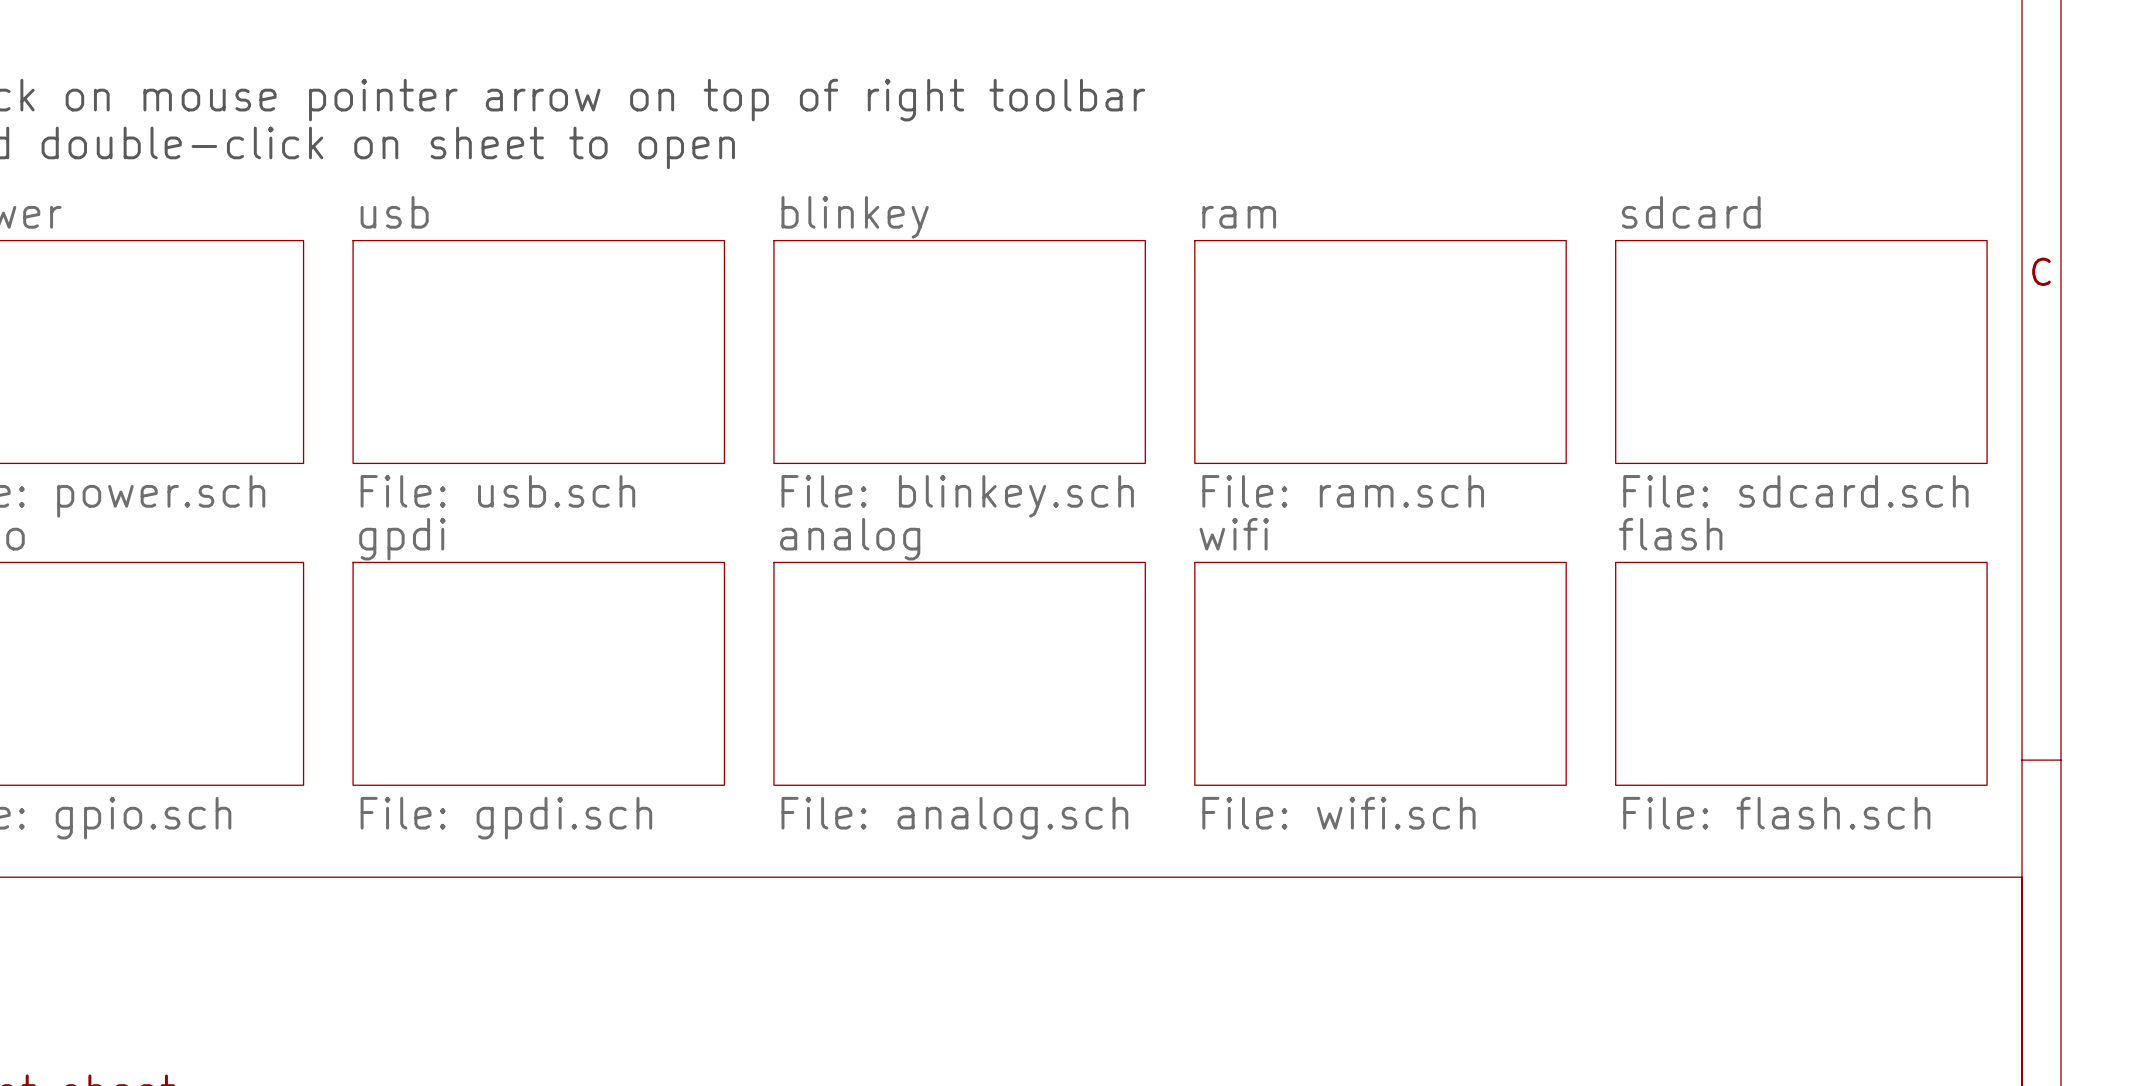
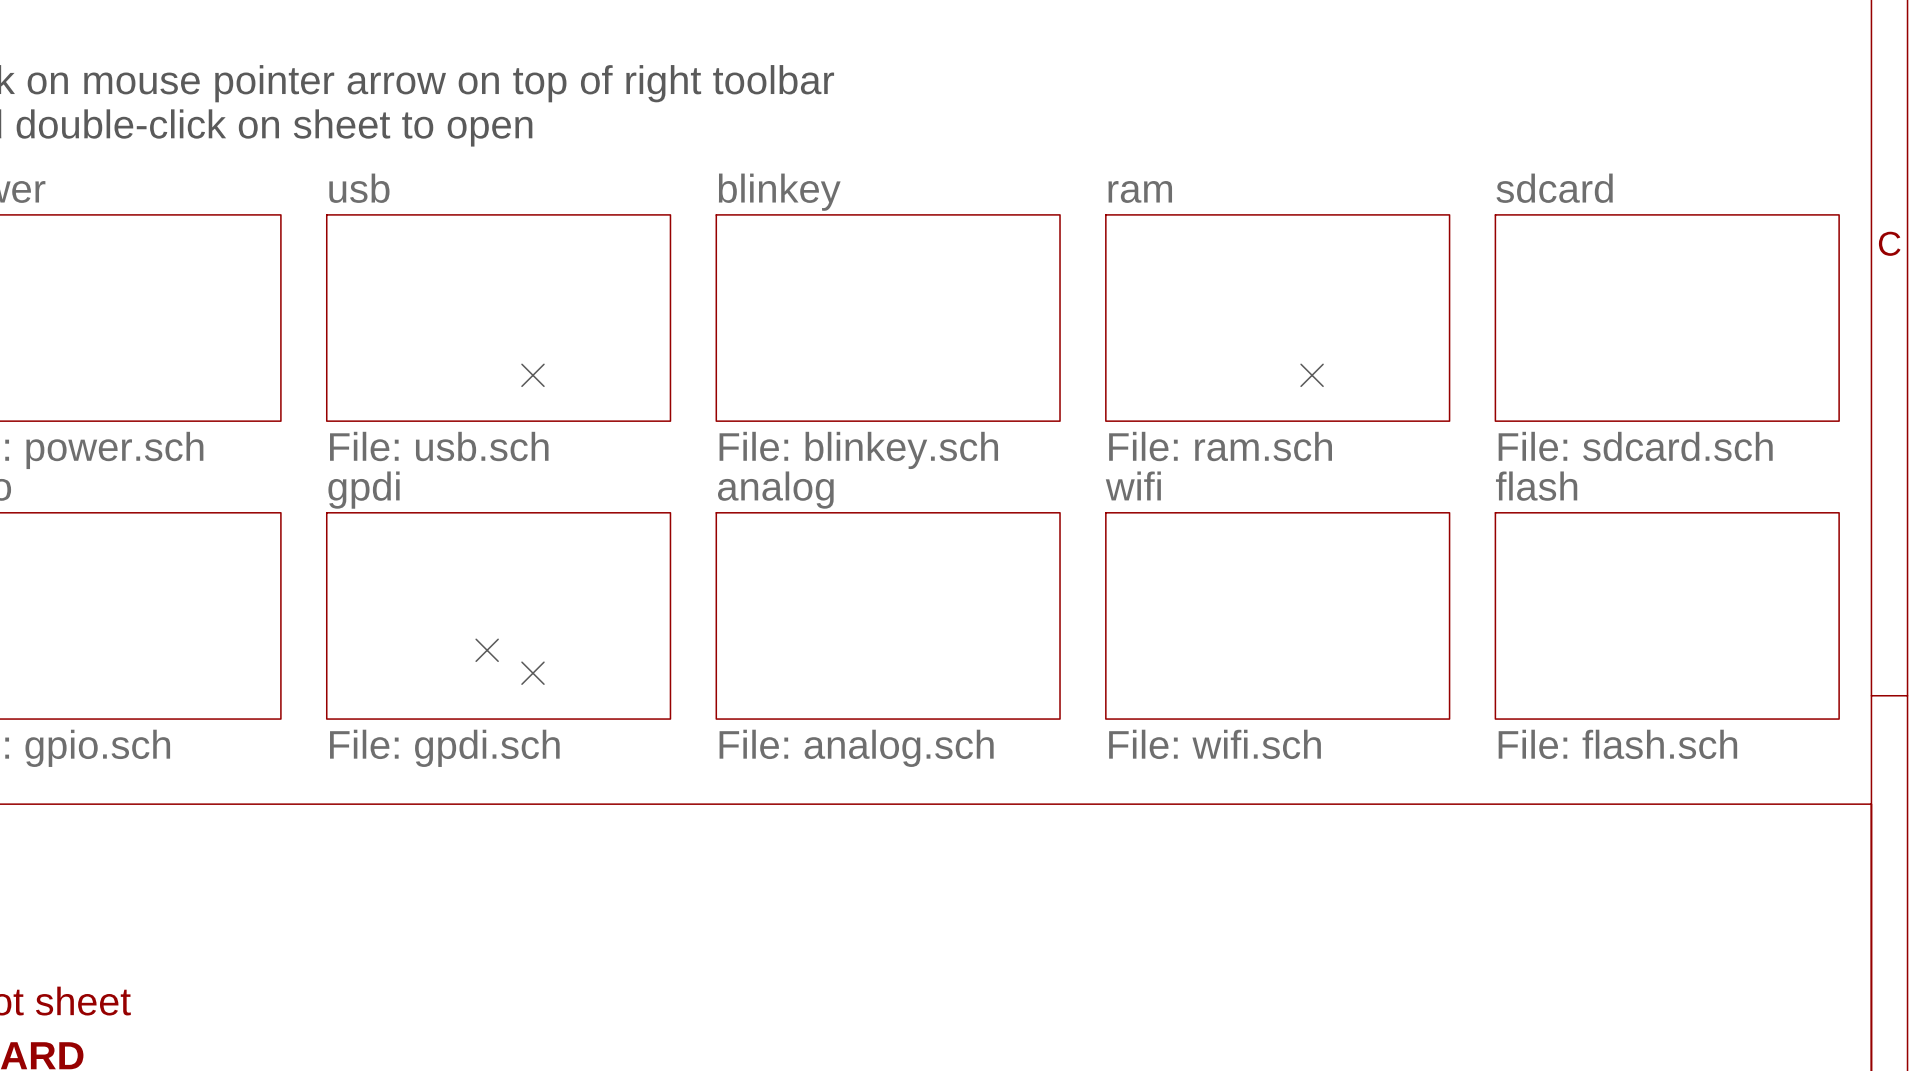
no-connect mark: none -> (532, 375)
no-connect mark: none -> (1312, 375)
no-connect mark: none -> (487, 650)
no-connect mark: none -> (532, 673)

